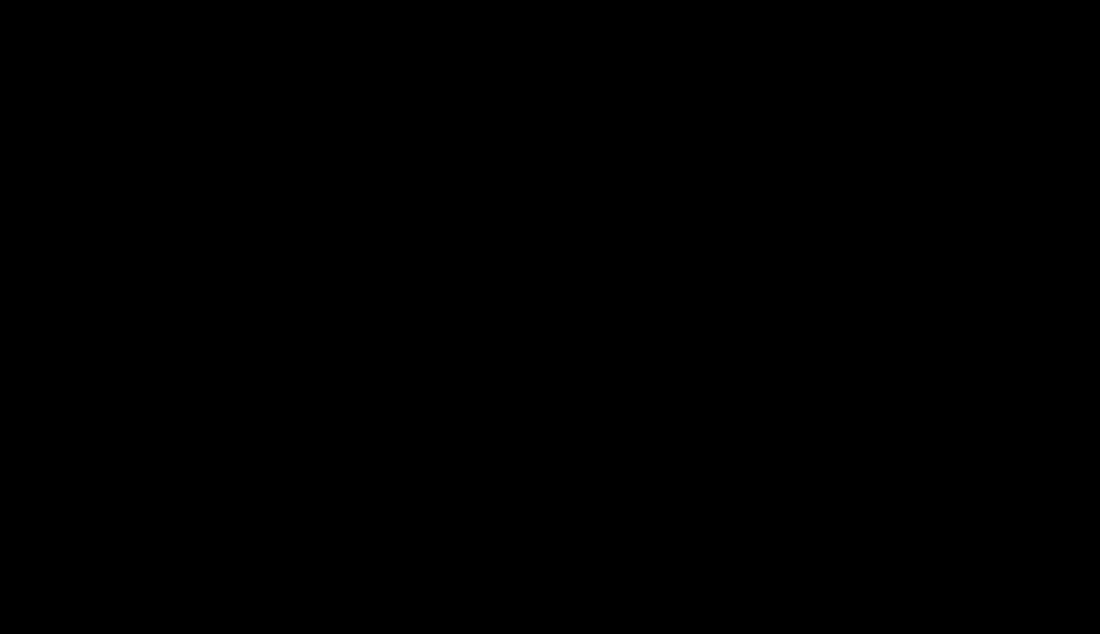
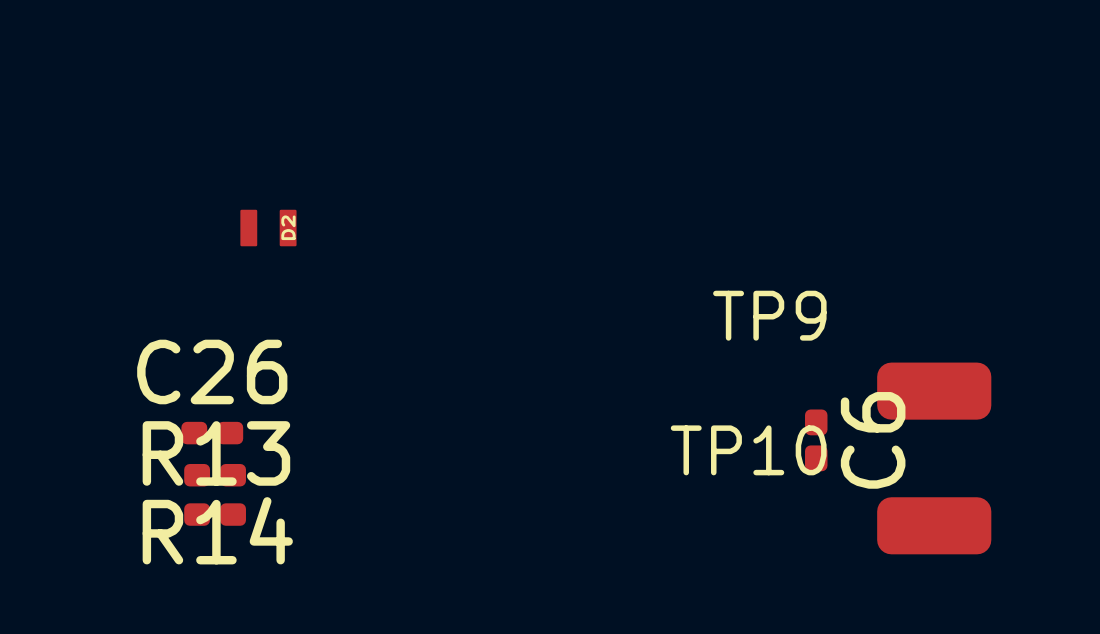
D2: none -> (268, 228)
TP9: none -> (934, 391)
C26: none -> (212, 433)
C6: none -> (816, 440)
R14: none -> (215, 475)
R13: none -> (215, 514)
TP10: none -> (934, 525)

